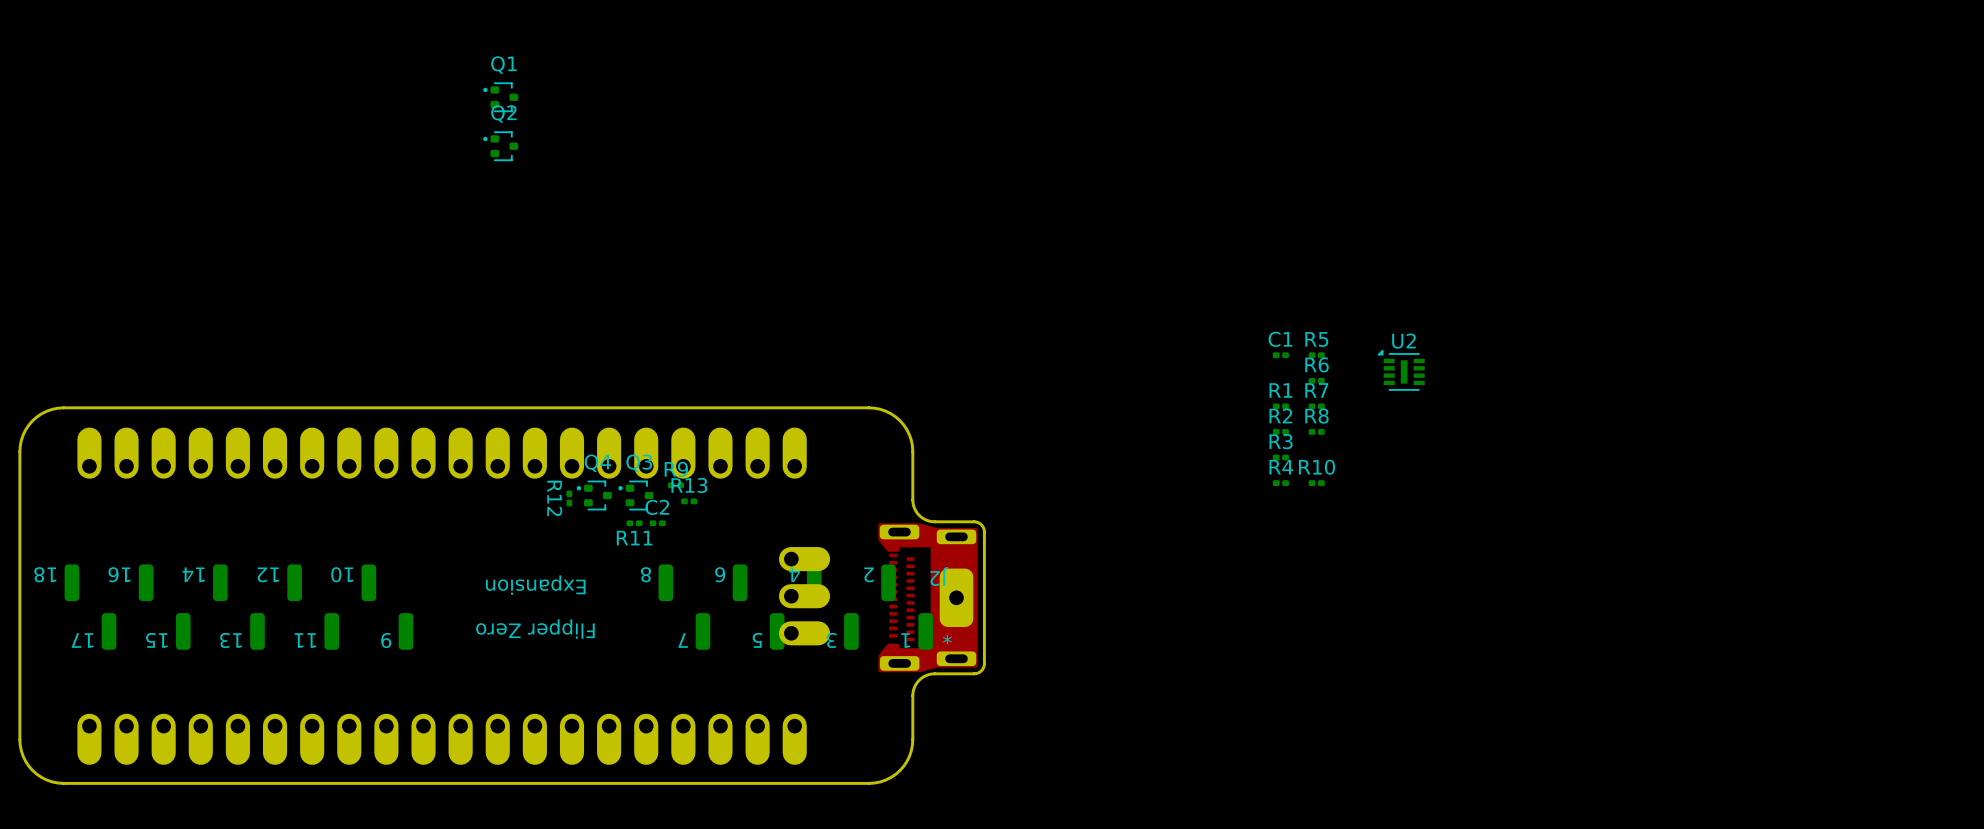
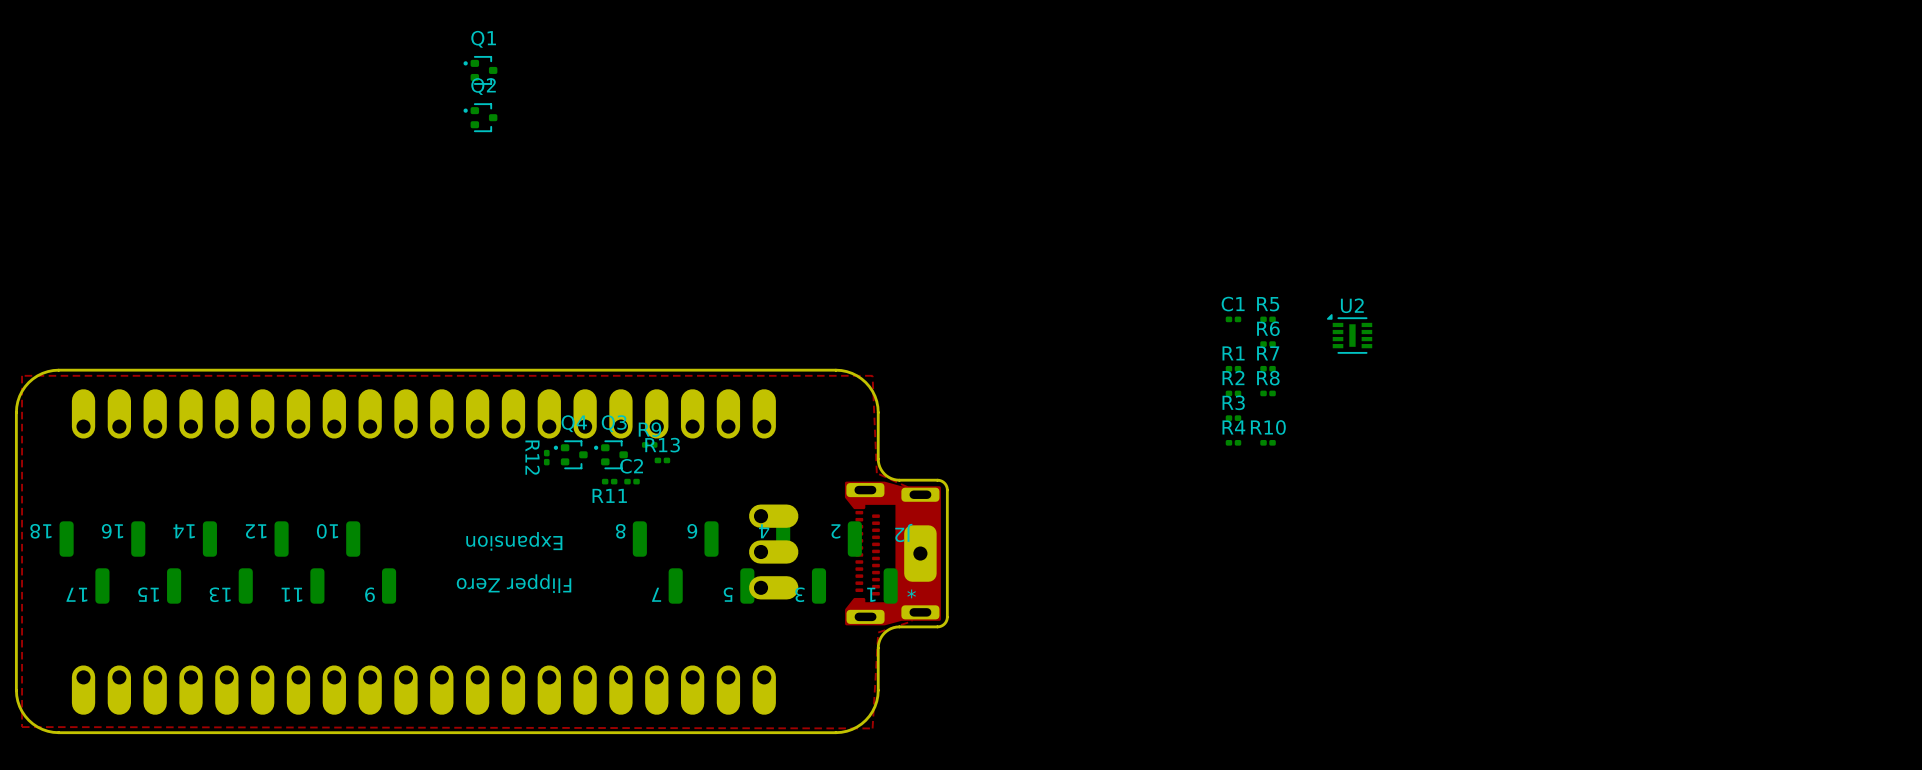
top zone outline: none -> (872, 375) (22, 375) (22, 727) (872, 728) (878, 632) (912, 621) (907, 487) (876, 473) (872, 375)

